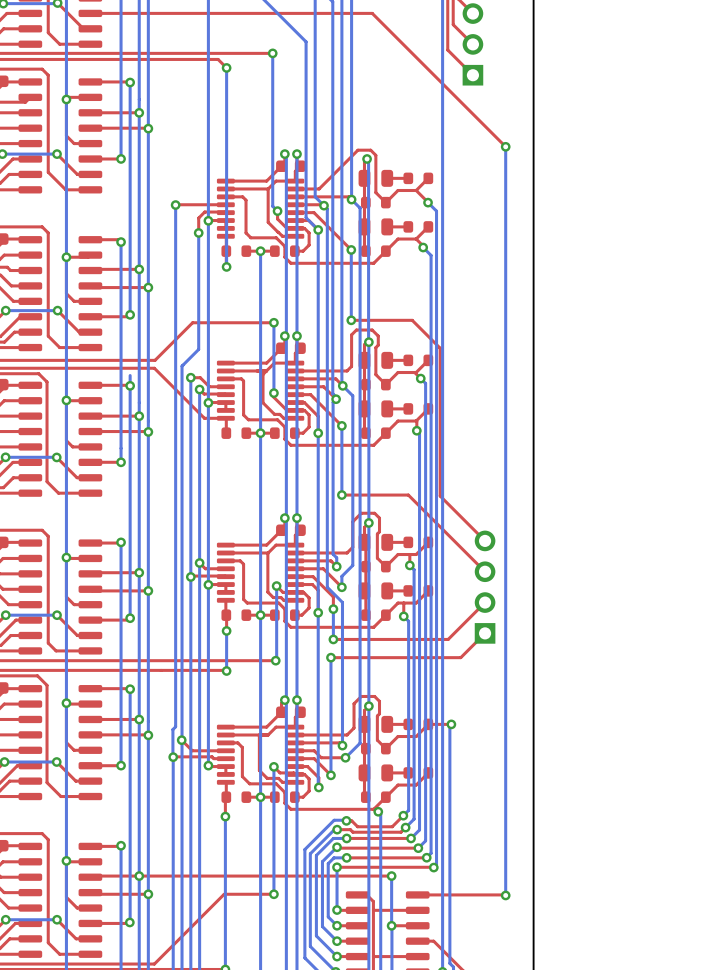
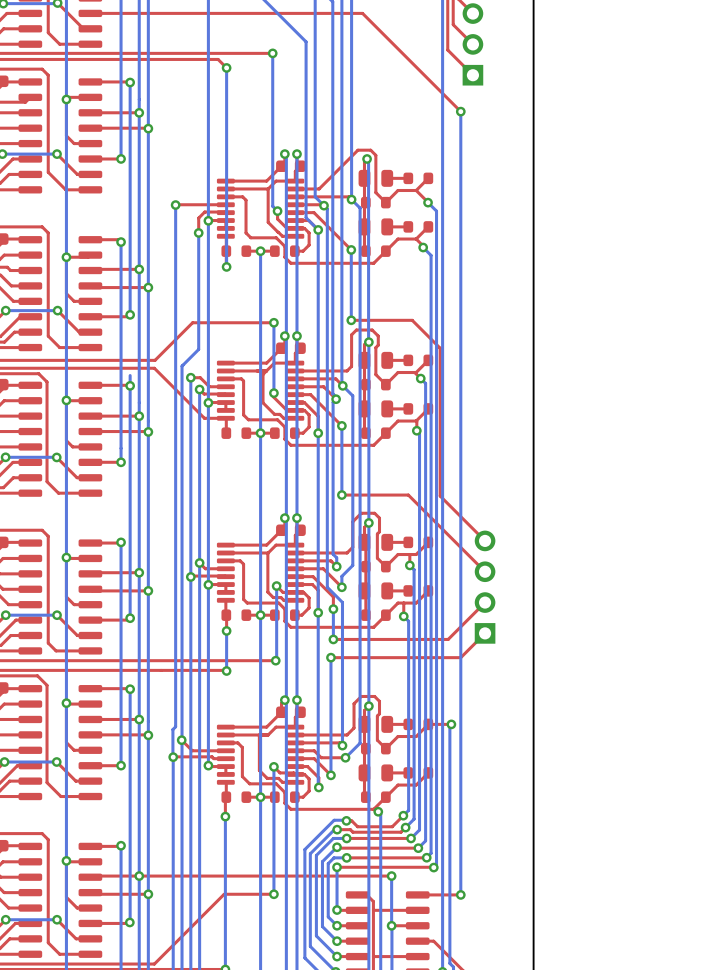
top track: (362, 13) (372, 13) (505, 146) -> (362, 13) (460, 111)
bottom track: none -> (460, 111) (460, 894)
bottom track: (505, 146) (505, 895) -> none
via position: (505, 146) -> (460, 111)
top track: (460, 894) (505, 895) -> none
via position: (505, 895) -> (460, 894)

